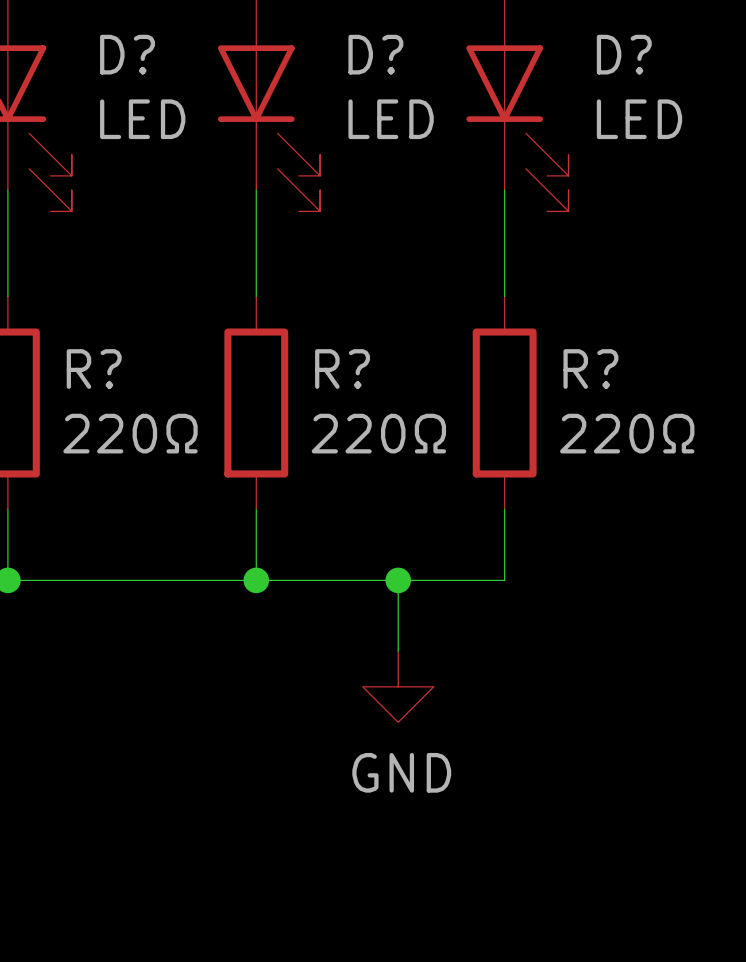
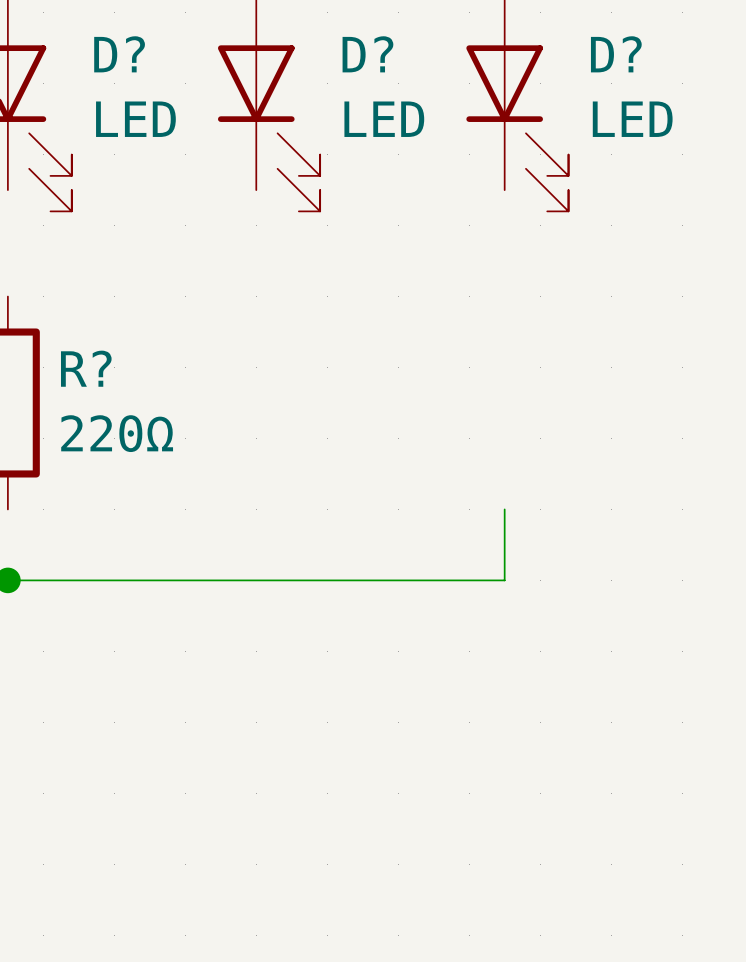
wire: (7, 190) (7, 296) -> none
wire: (256, 190) (256, 296) -> none
wire: (504, 190) (504, 296) -> none
R?: 220Ω (256, 402) -> none
R?: 220Ω (504, 402) -> none
wire: (7, 509) (7, 580) -> none
wire: (256, 509) (256, 580) -> none
junction: (256, 580) -> none
wire: (398, 580) (398, 651) -> none
junction: (398, 580) -> none
power symbol: GND (398, 686) -> none

